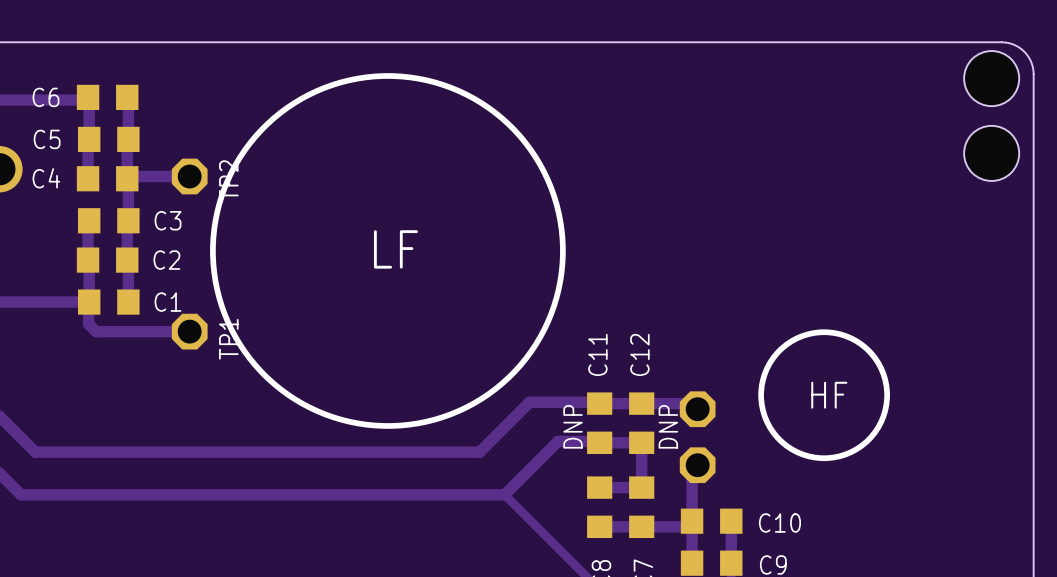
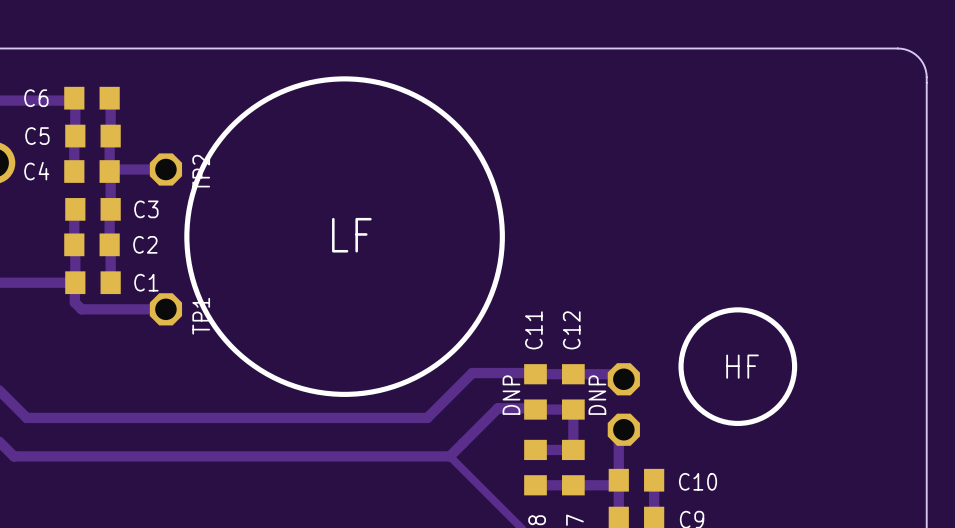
hole: (991, 78) -> none
hole: (991, 153) -> none

